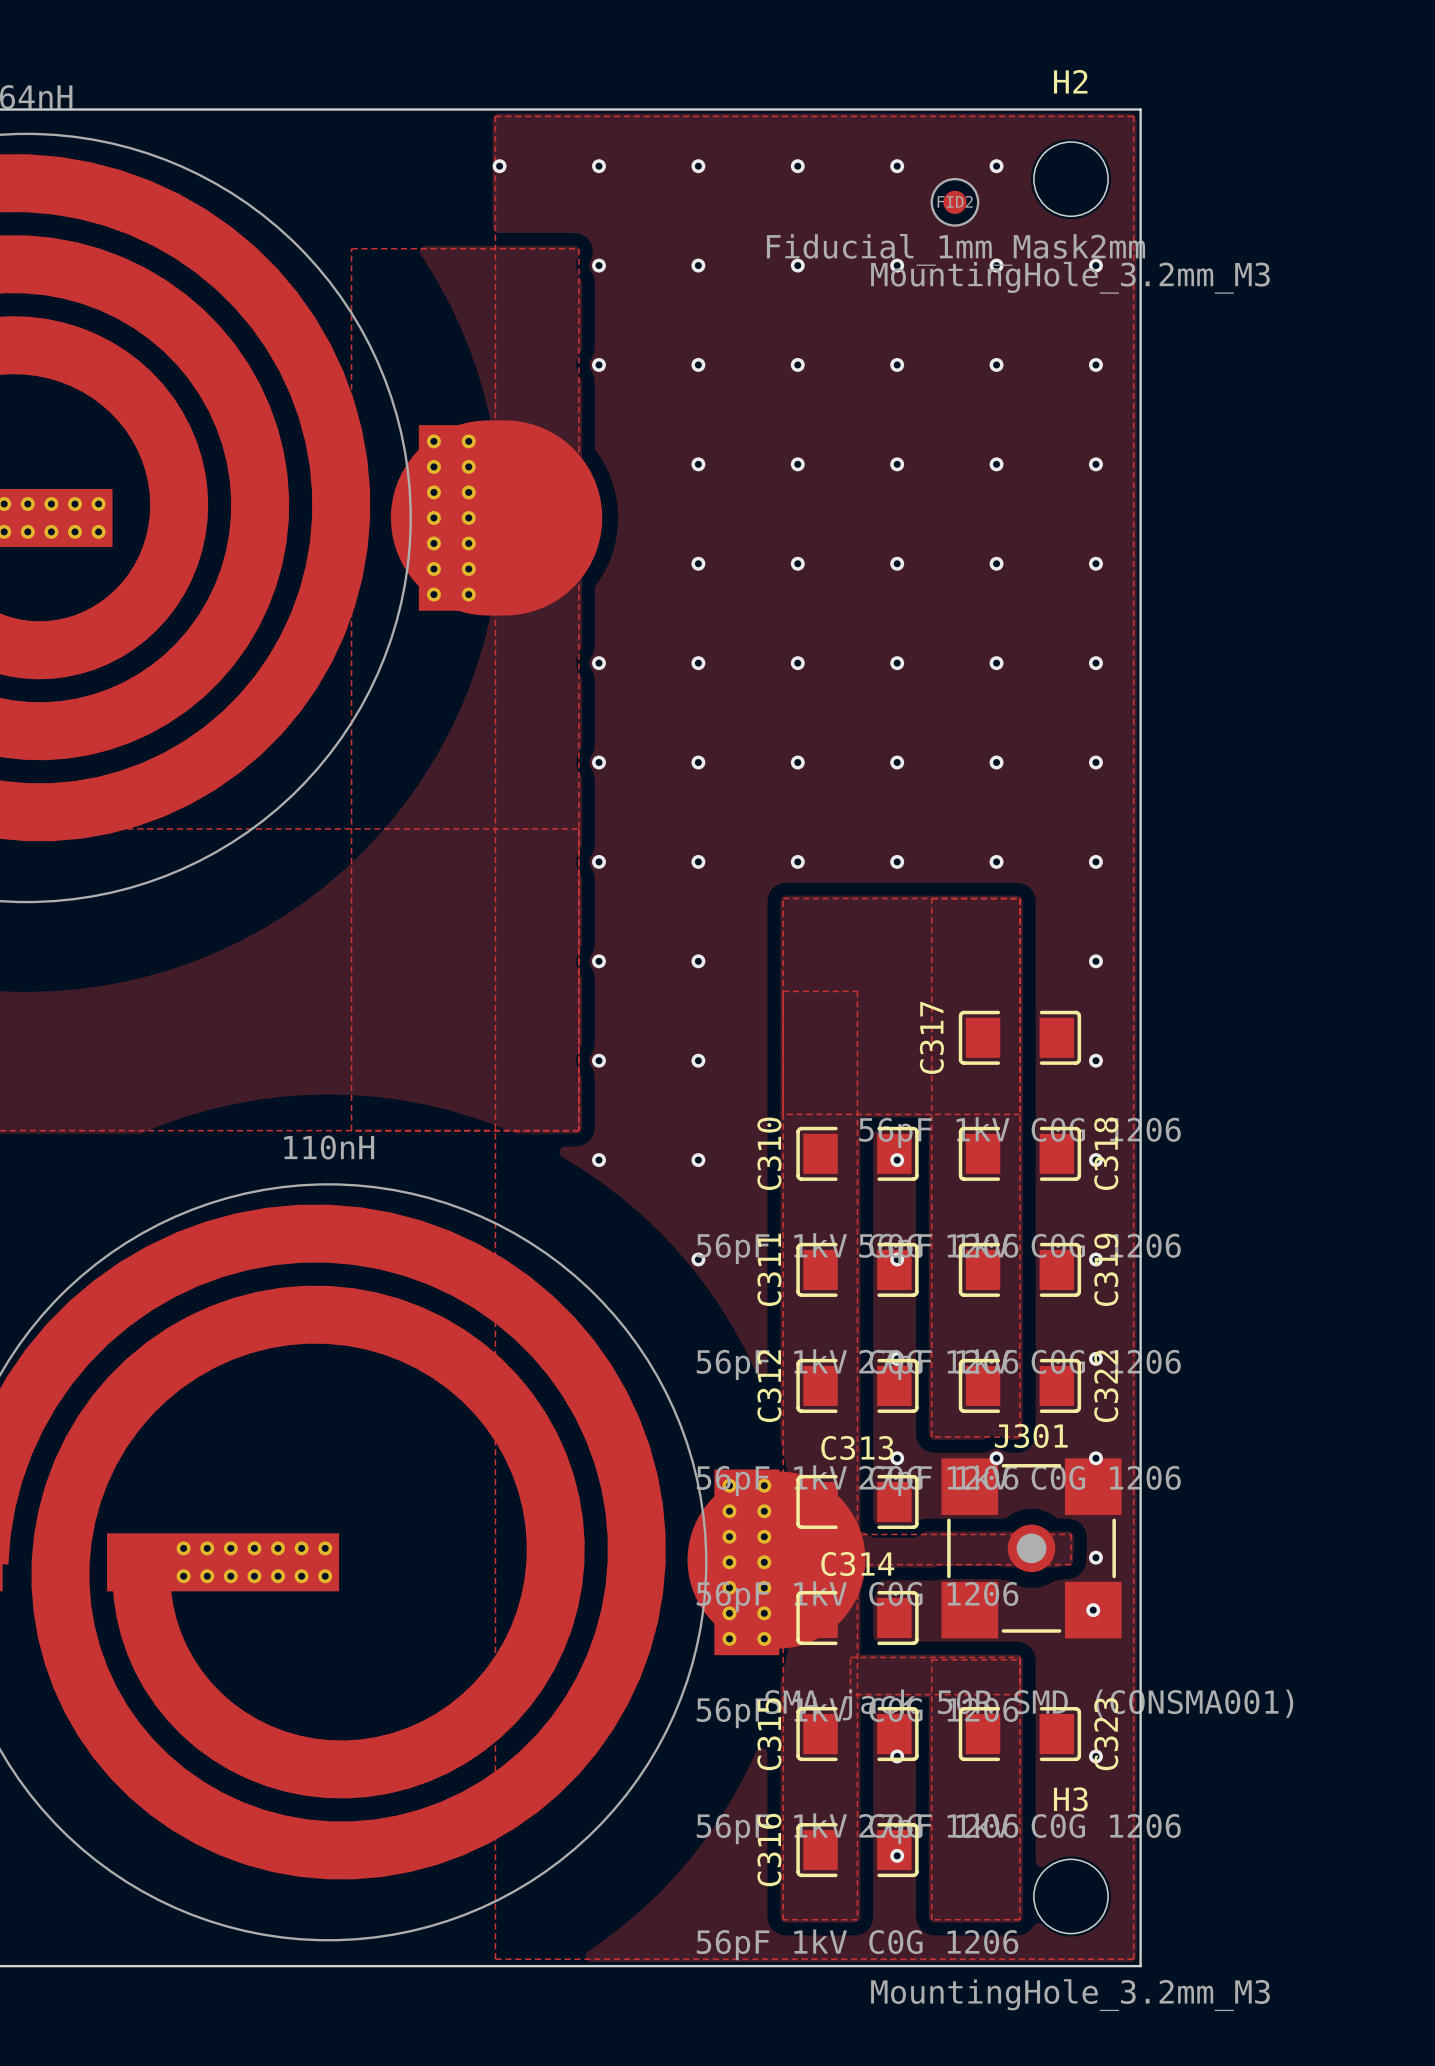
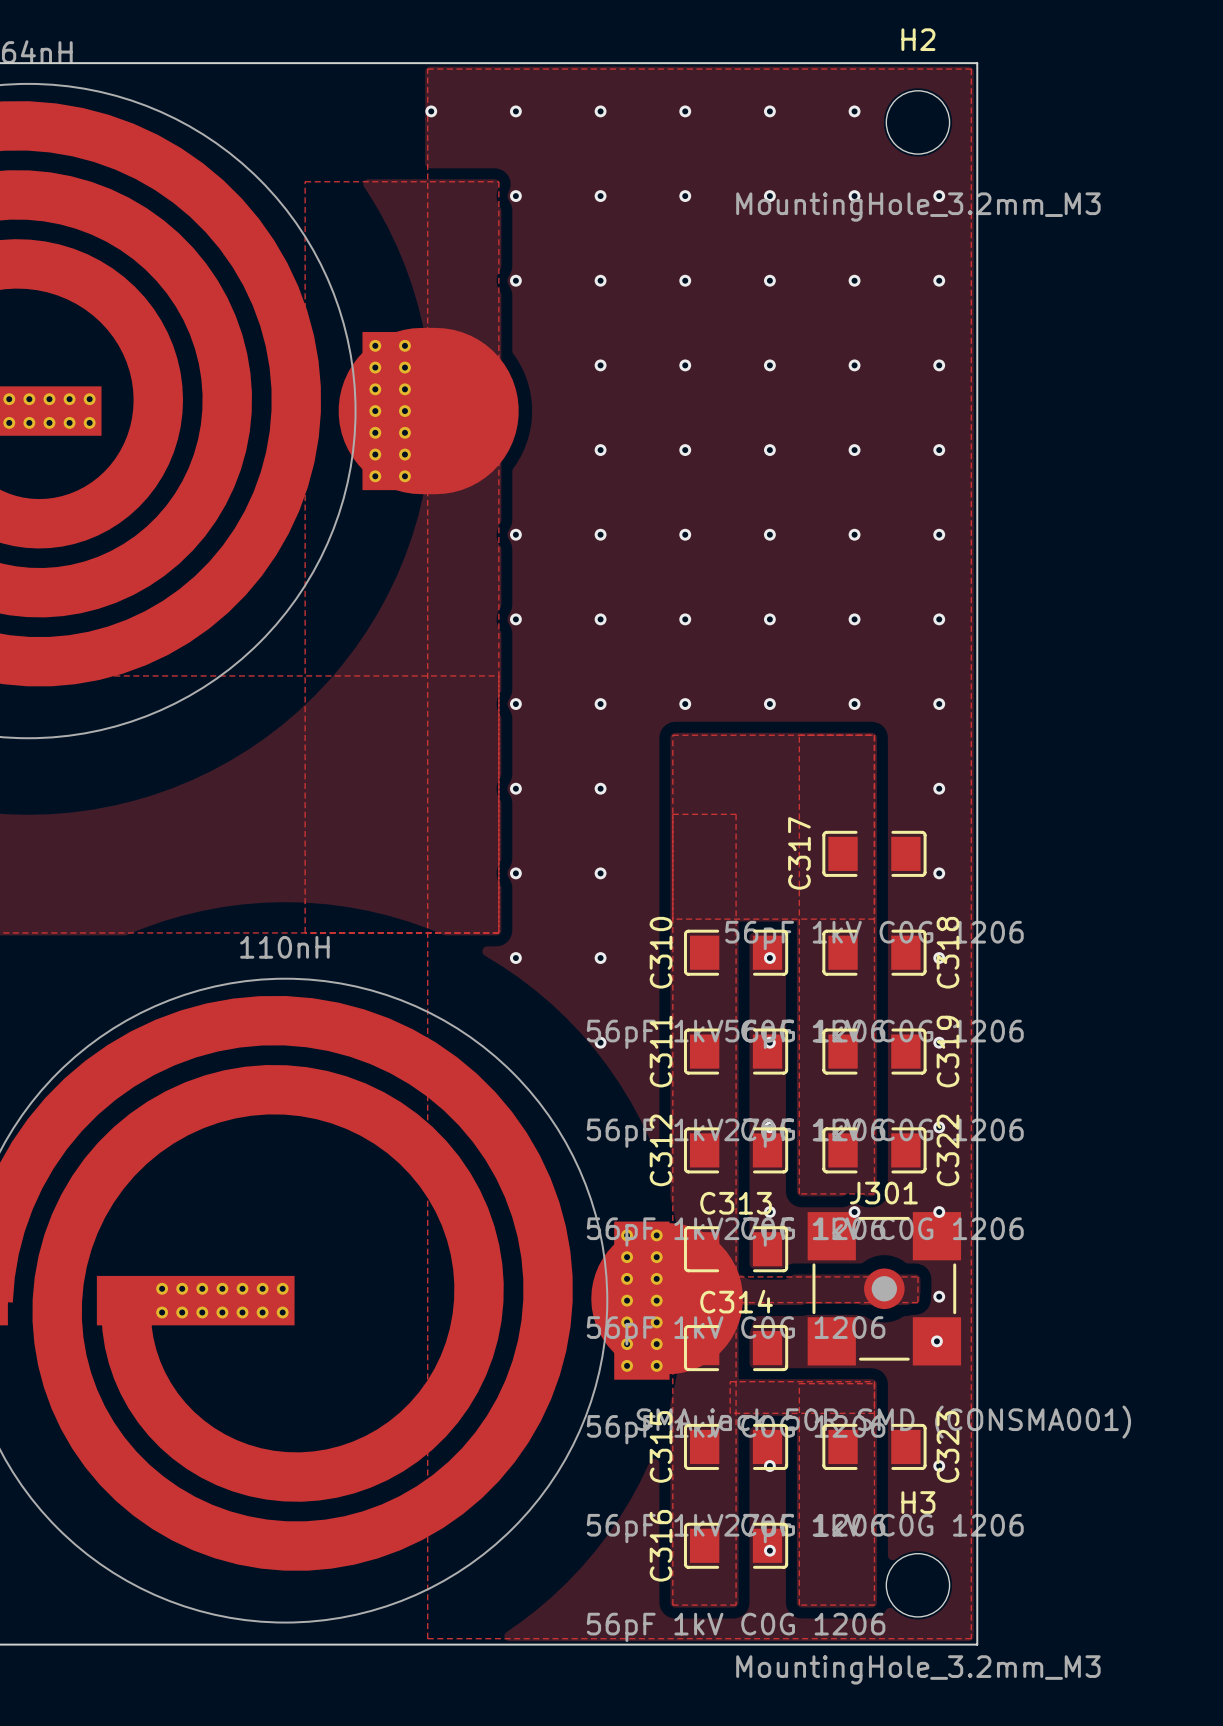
FID2: Fiducial_1mm_Mask2mm (954, 202) -> none

